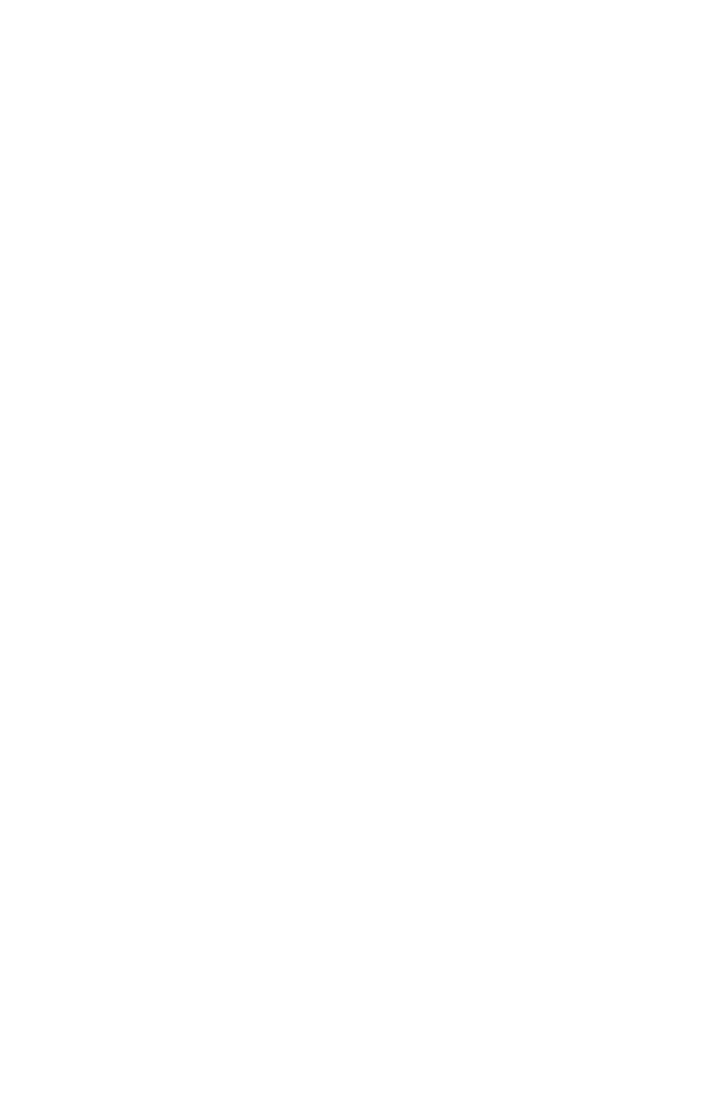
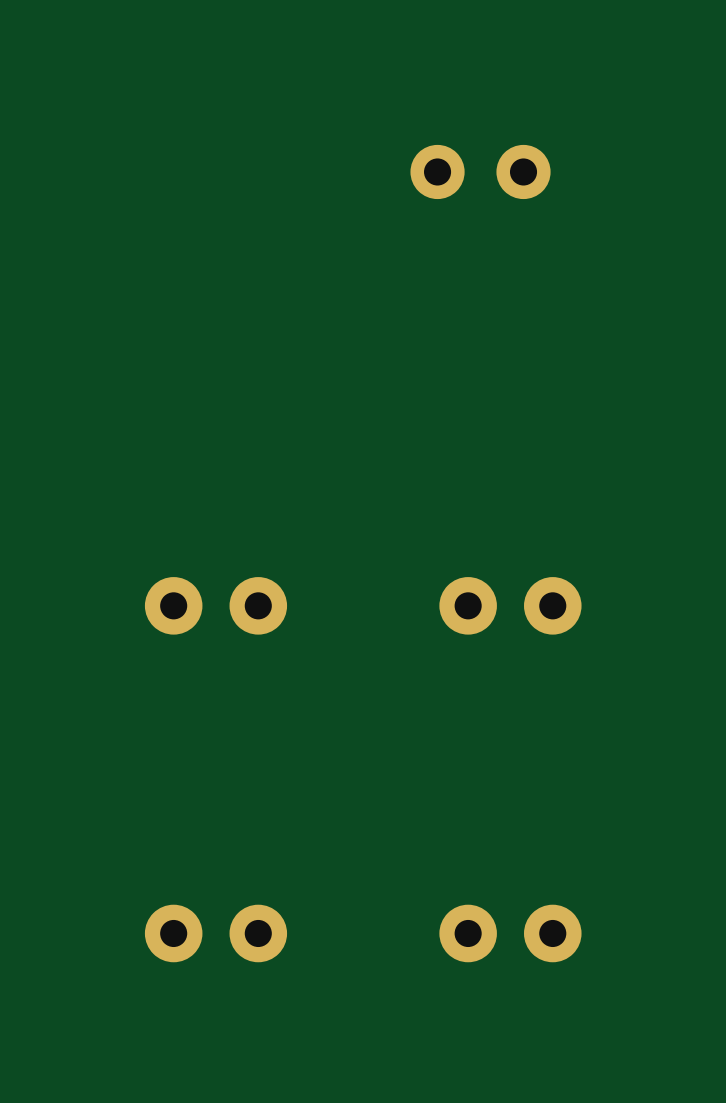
part: none -> (480, 171)
part: none -> (215, 605)
part: none -> (510, 605)
part: none -> (215, 933)
part: none -> (510, 933)

